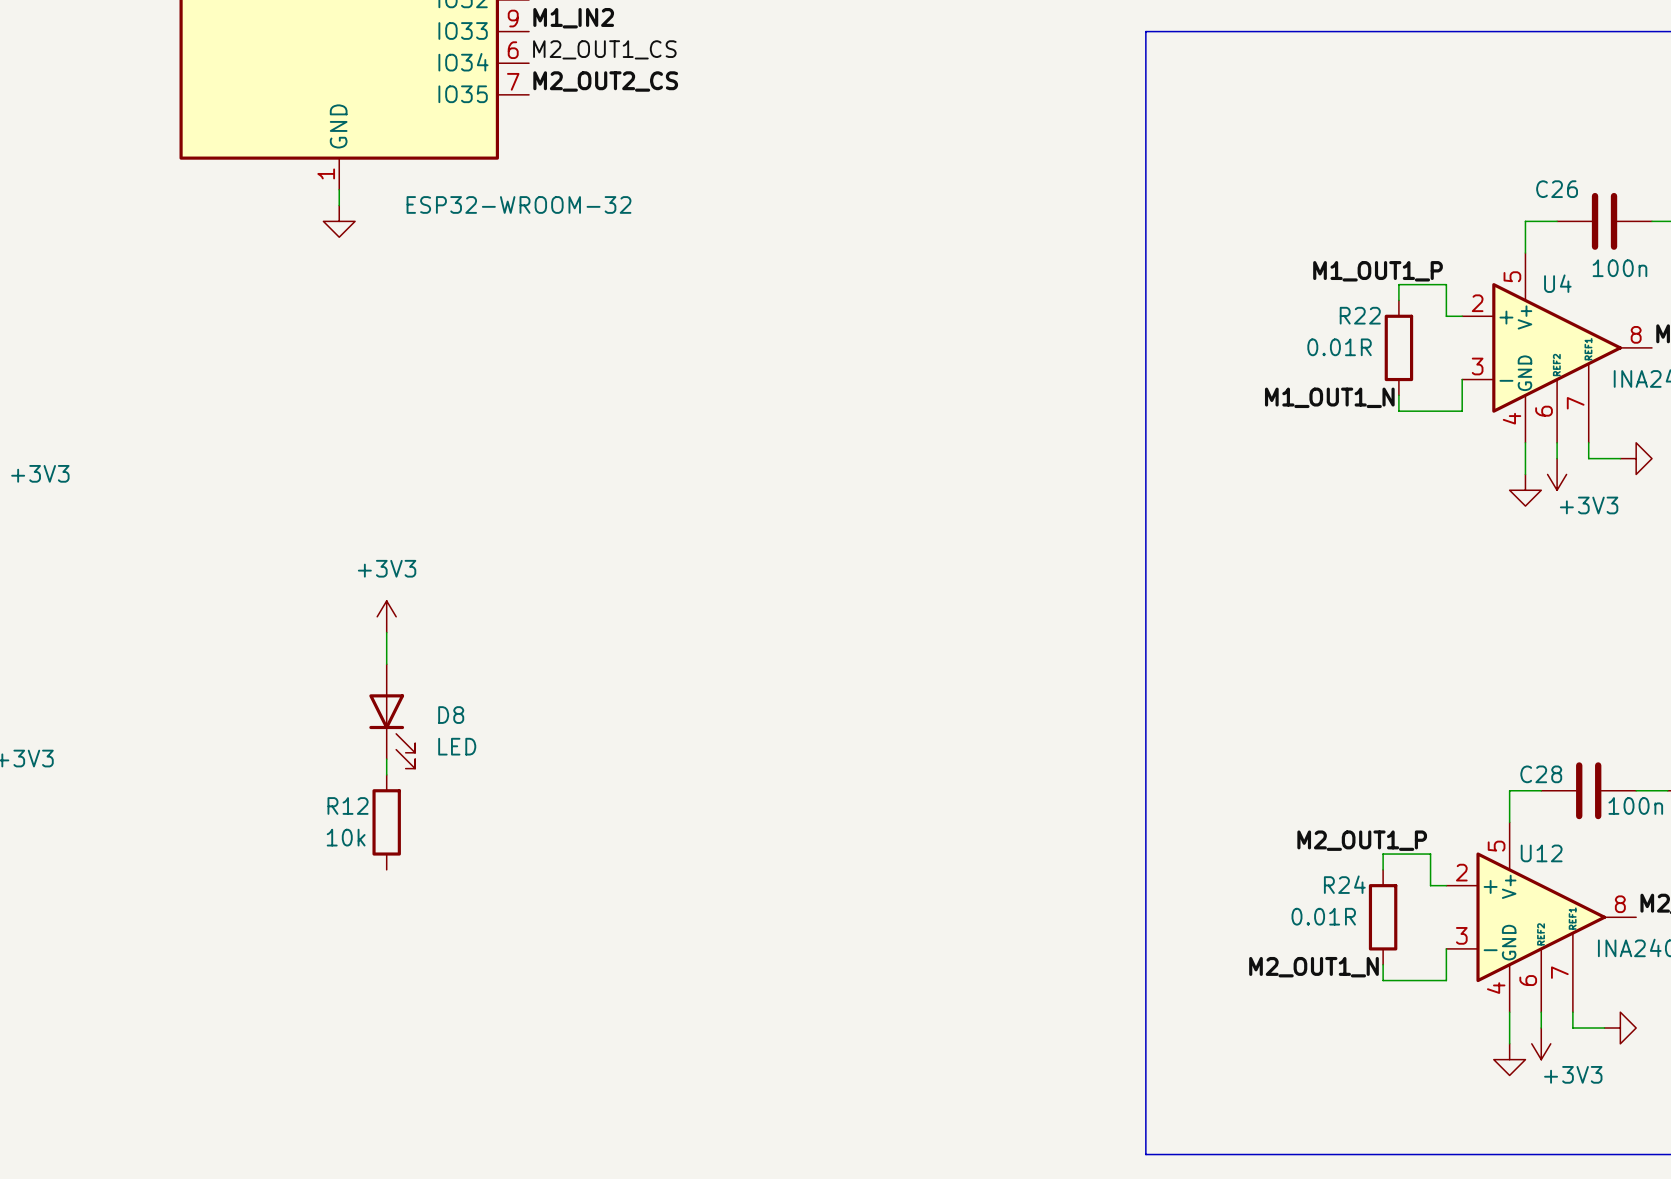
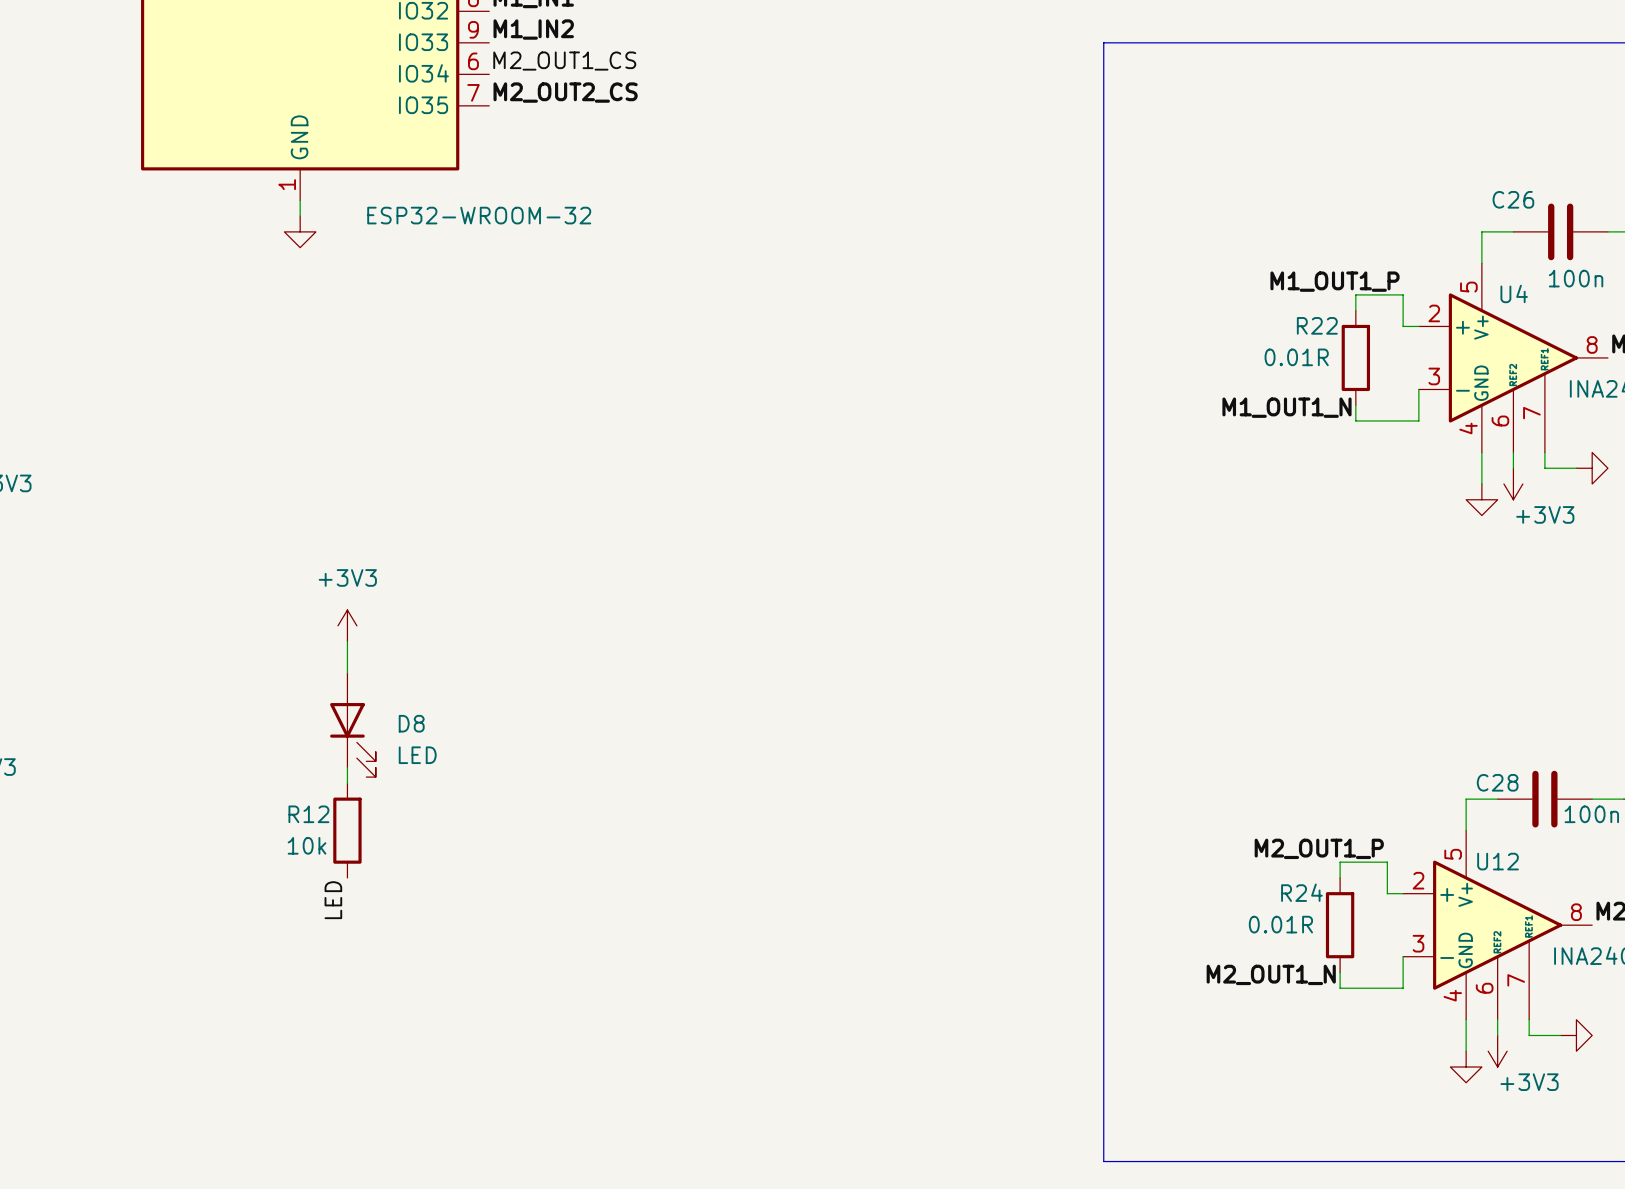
label: none -> LED (333, 900)

